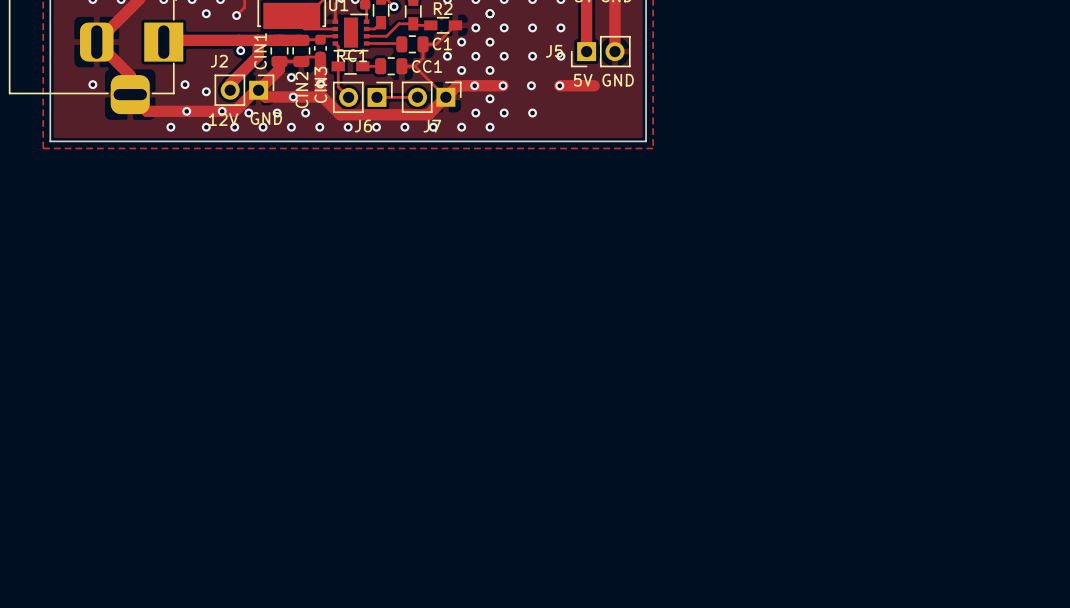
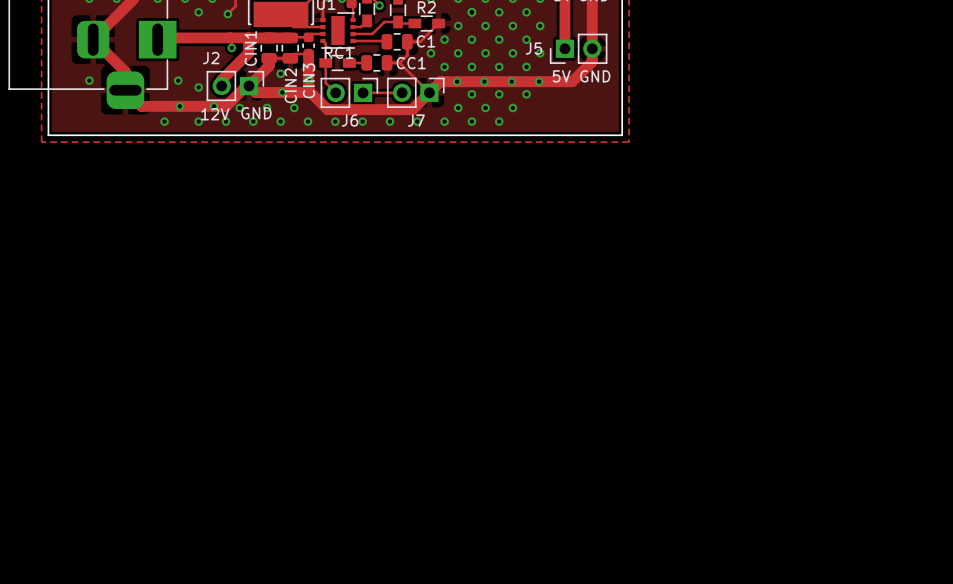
via: none -> (499, 12)
via: none -> (526, 12)
via: none -> (499, 39)
via: none -> (526, 39)
track: none -> (592, 48) (592, 61) (572, 81)
via: none -> (499, 66)
via: none -> (526, 66)
track: none -> (484, 81) (539, 81)
via: none -> (499, 94)
via: none -> (526, 94)
via: none -> (499, 121)

